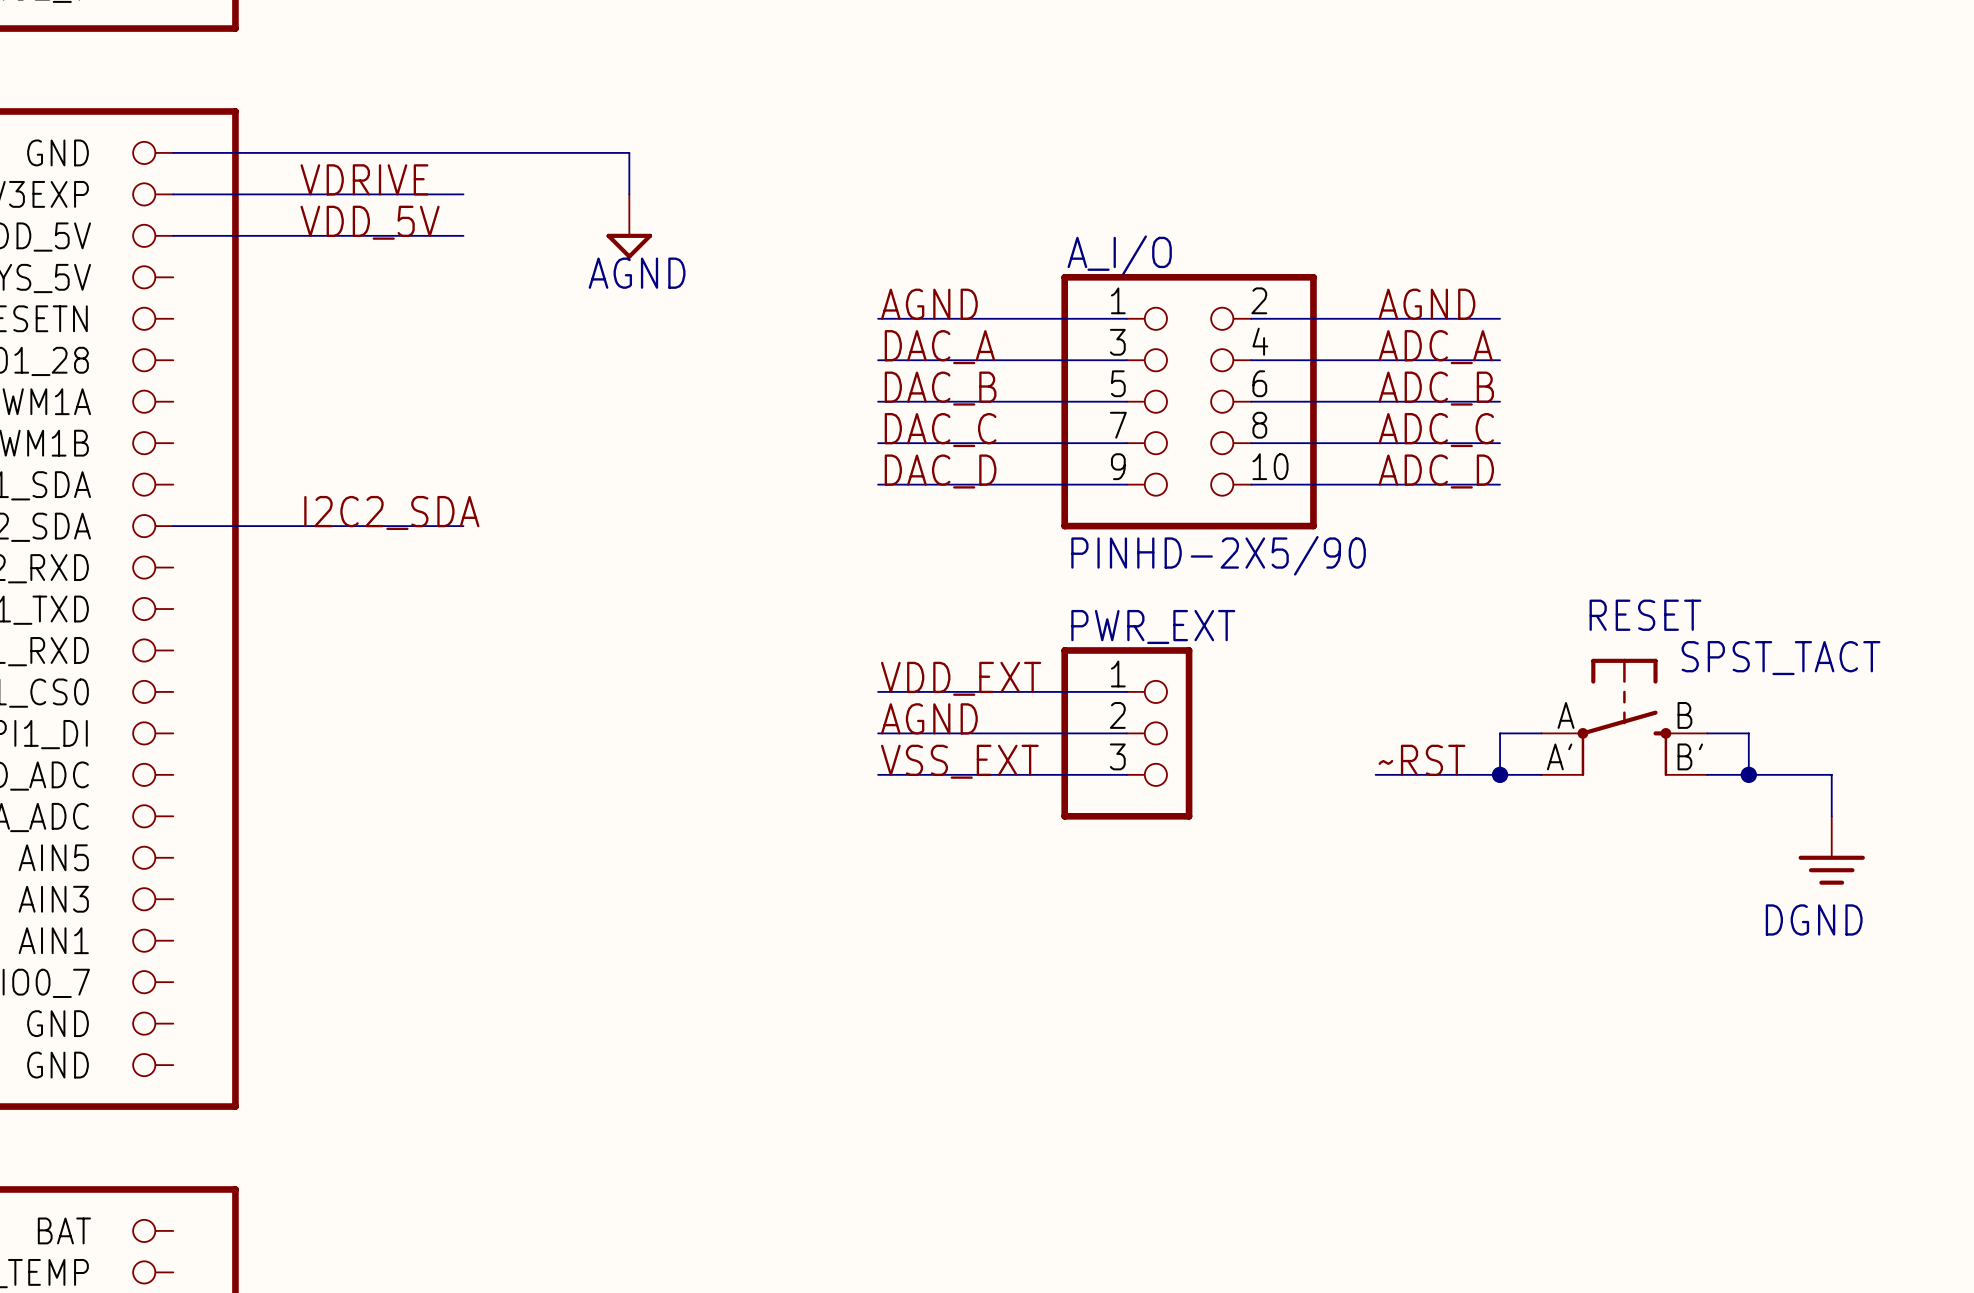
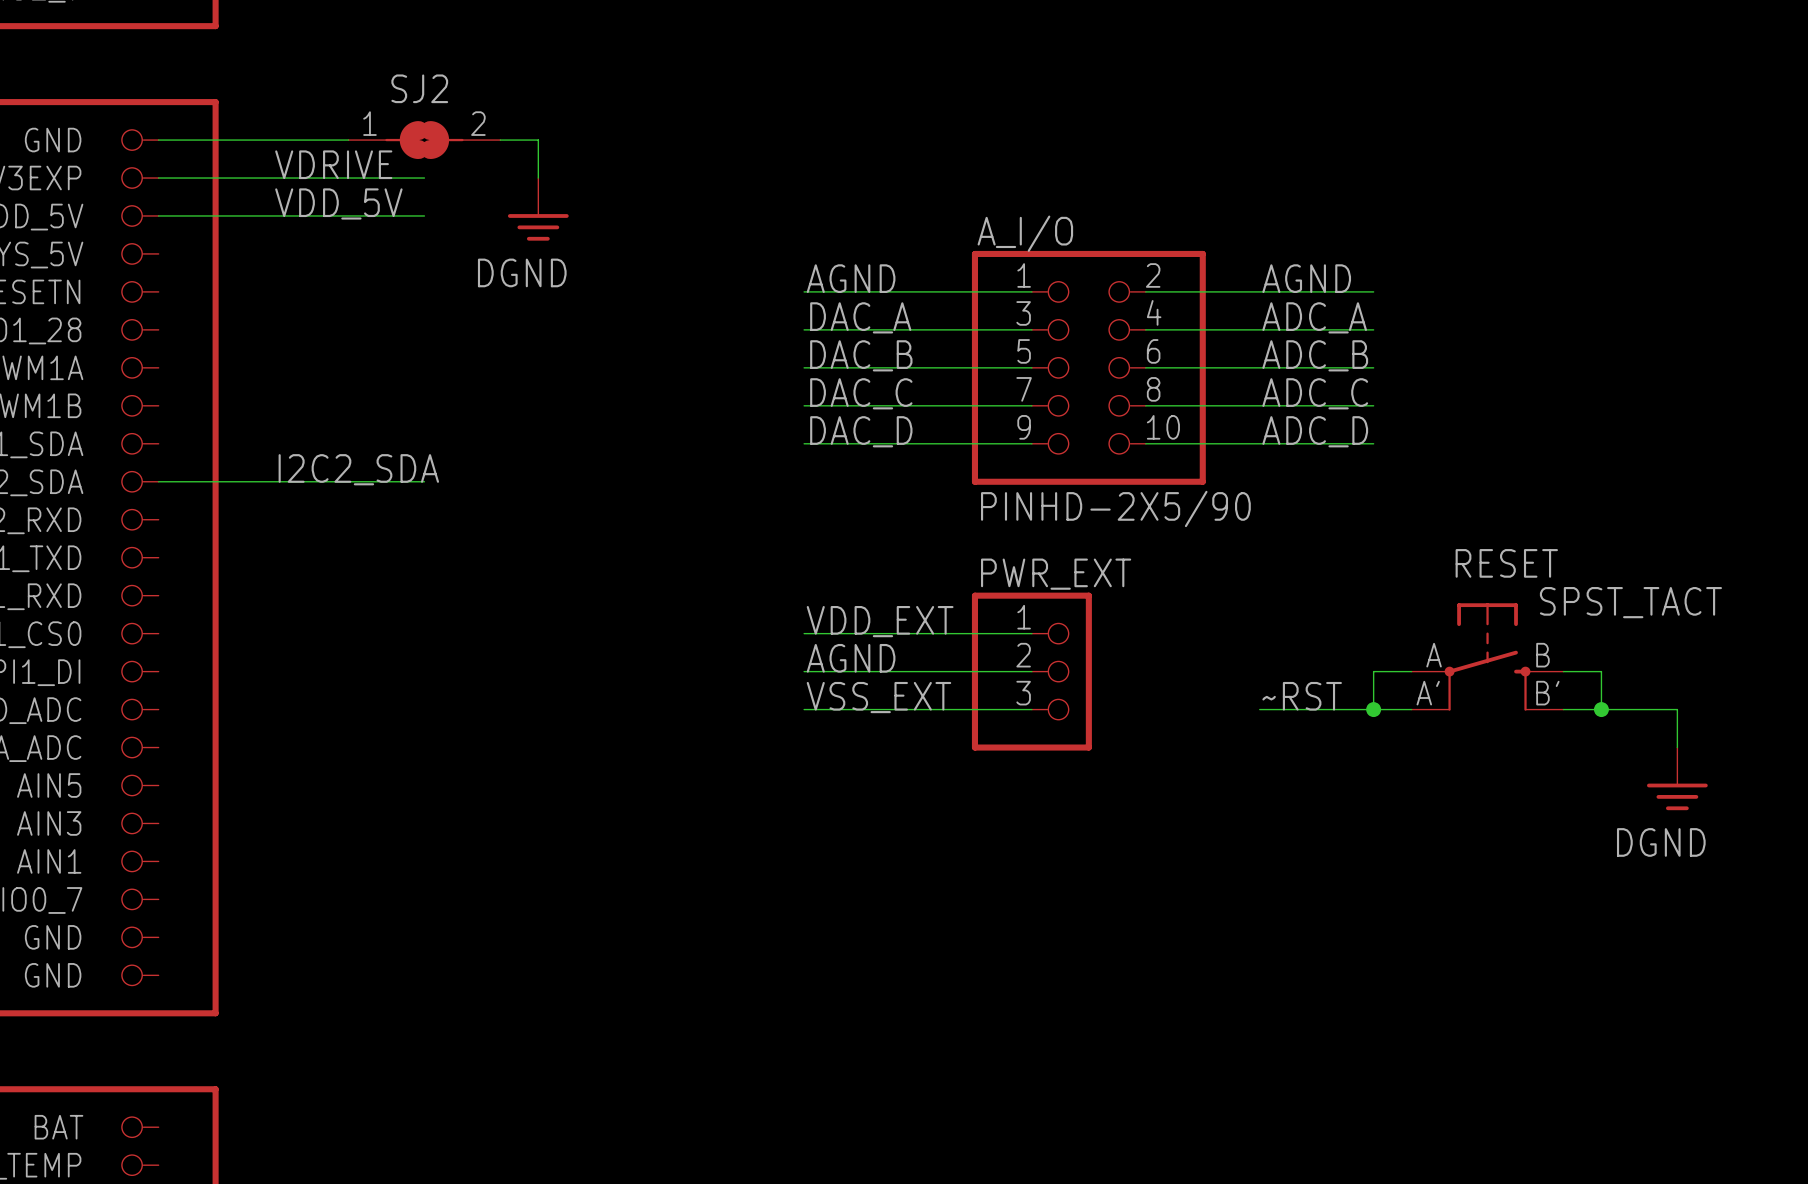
SJ2: none -> (424, 140)
wire: (587, 152) (629, 152) (629, 194) -> (538, 140) (538, 178)
power symbol: AGND (629, 226) -> none
power symbol: none -> DGND (538, 209)

